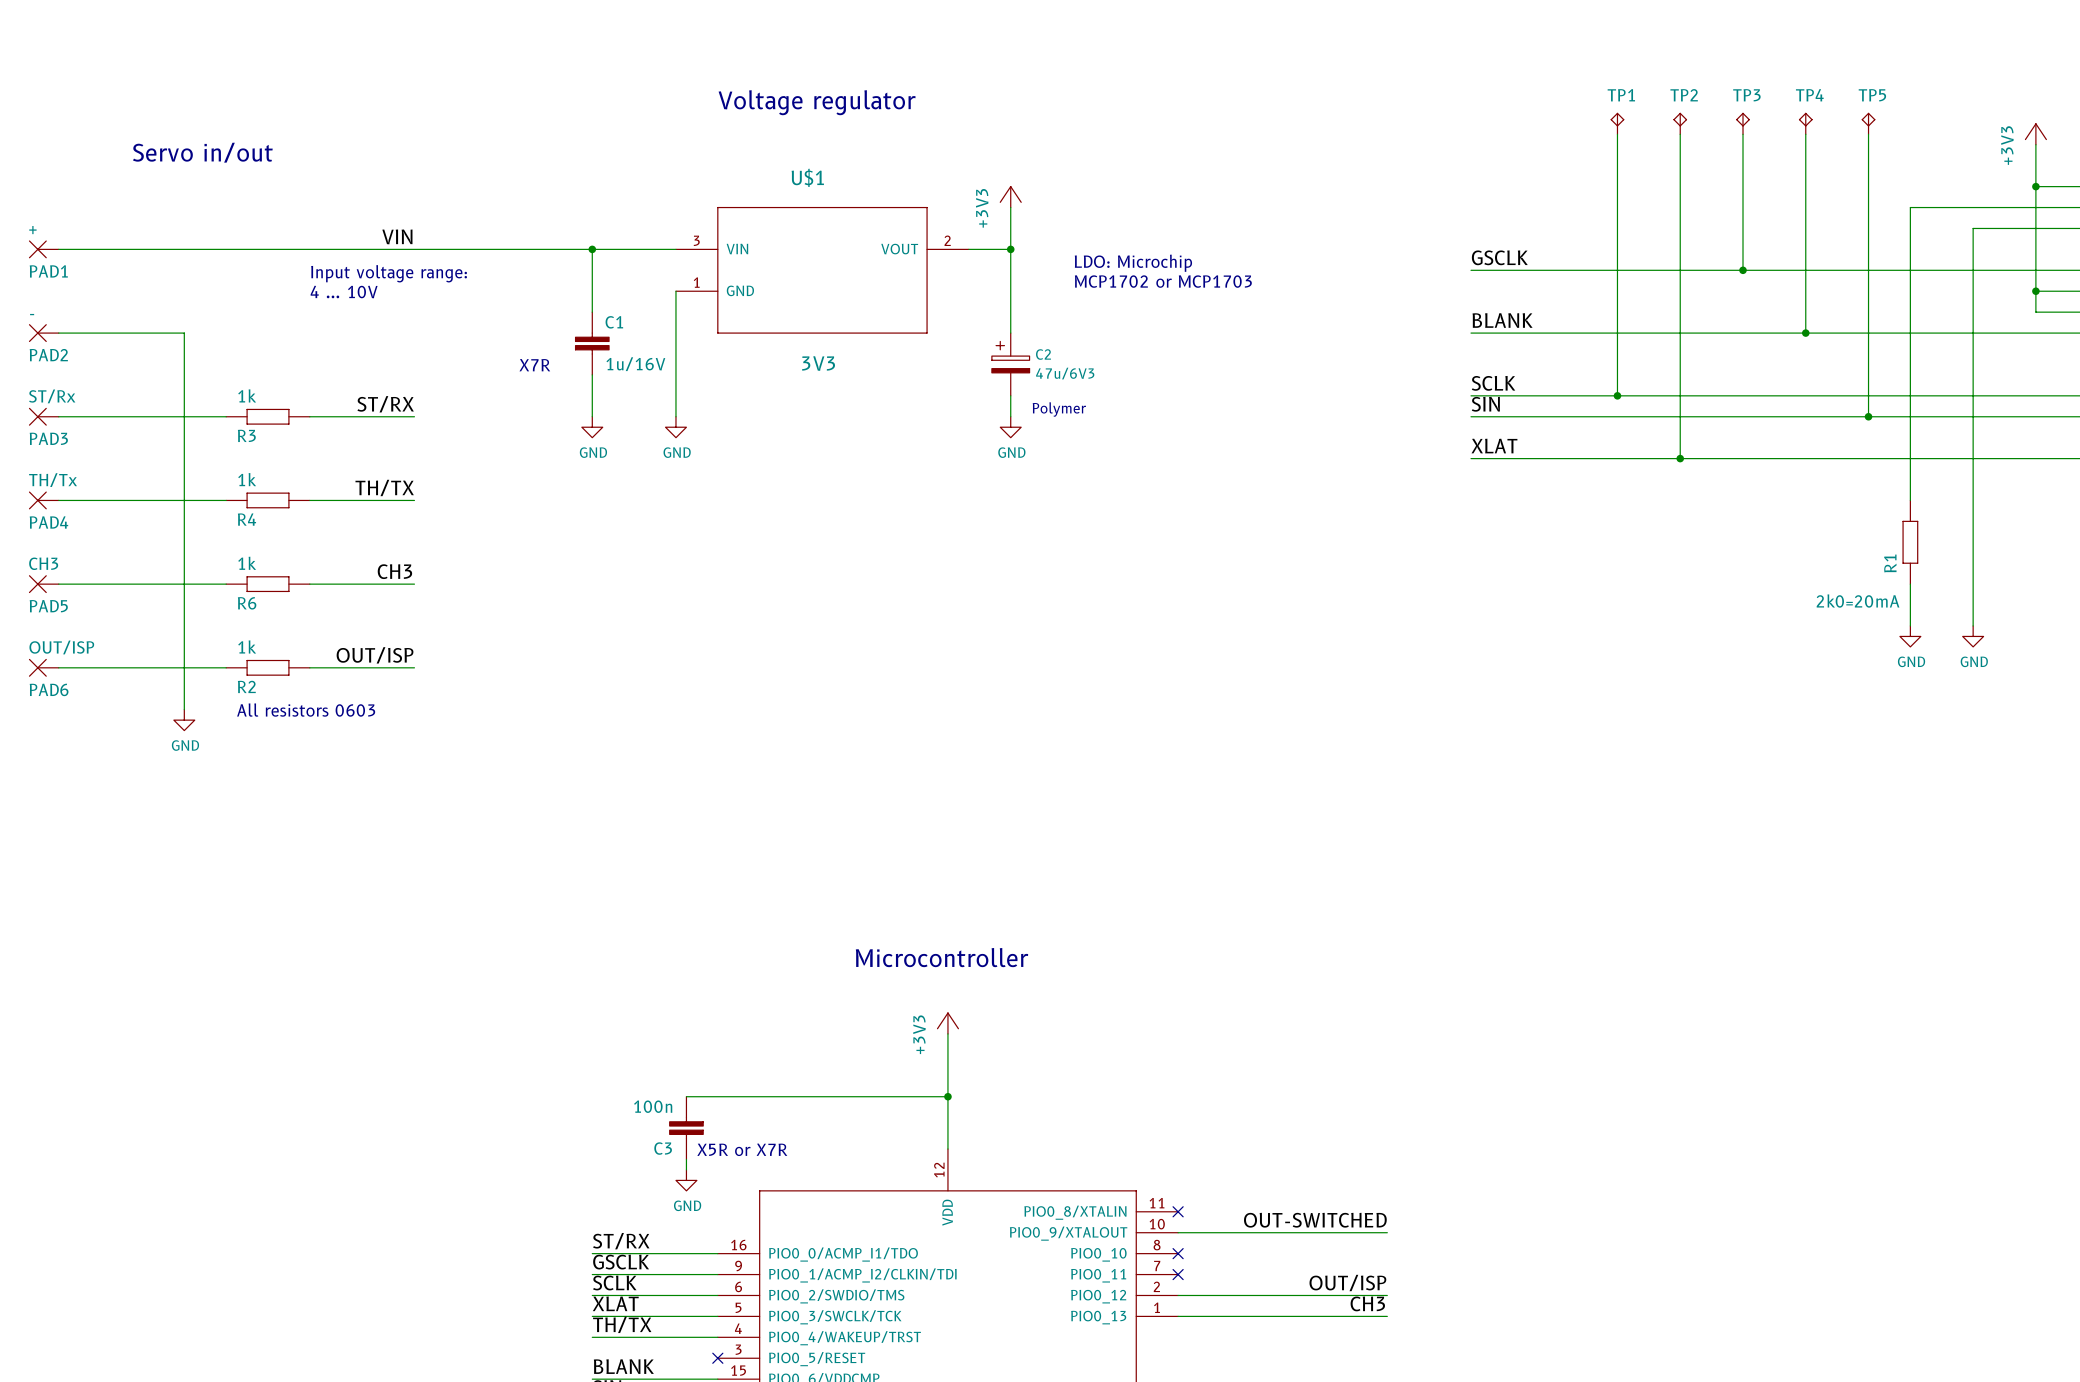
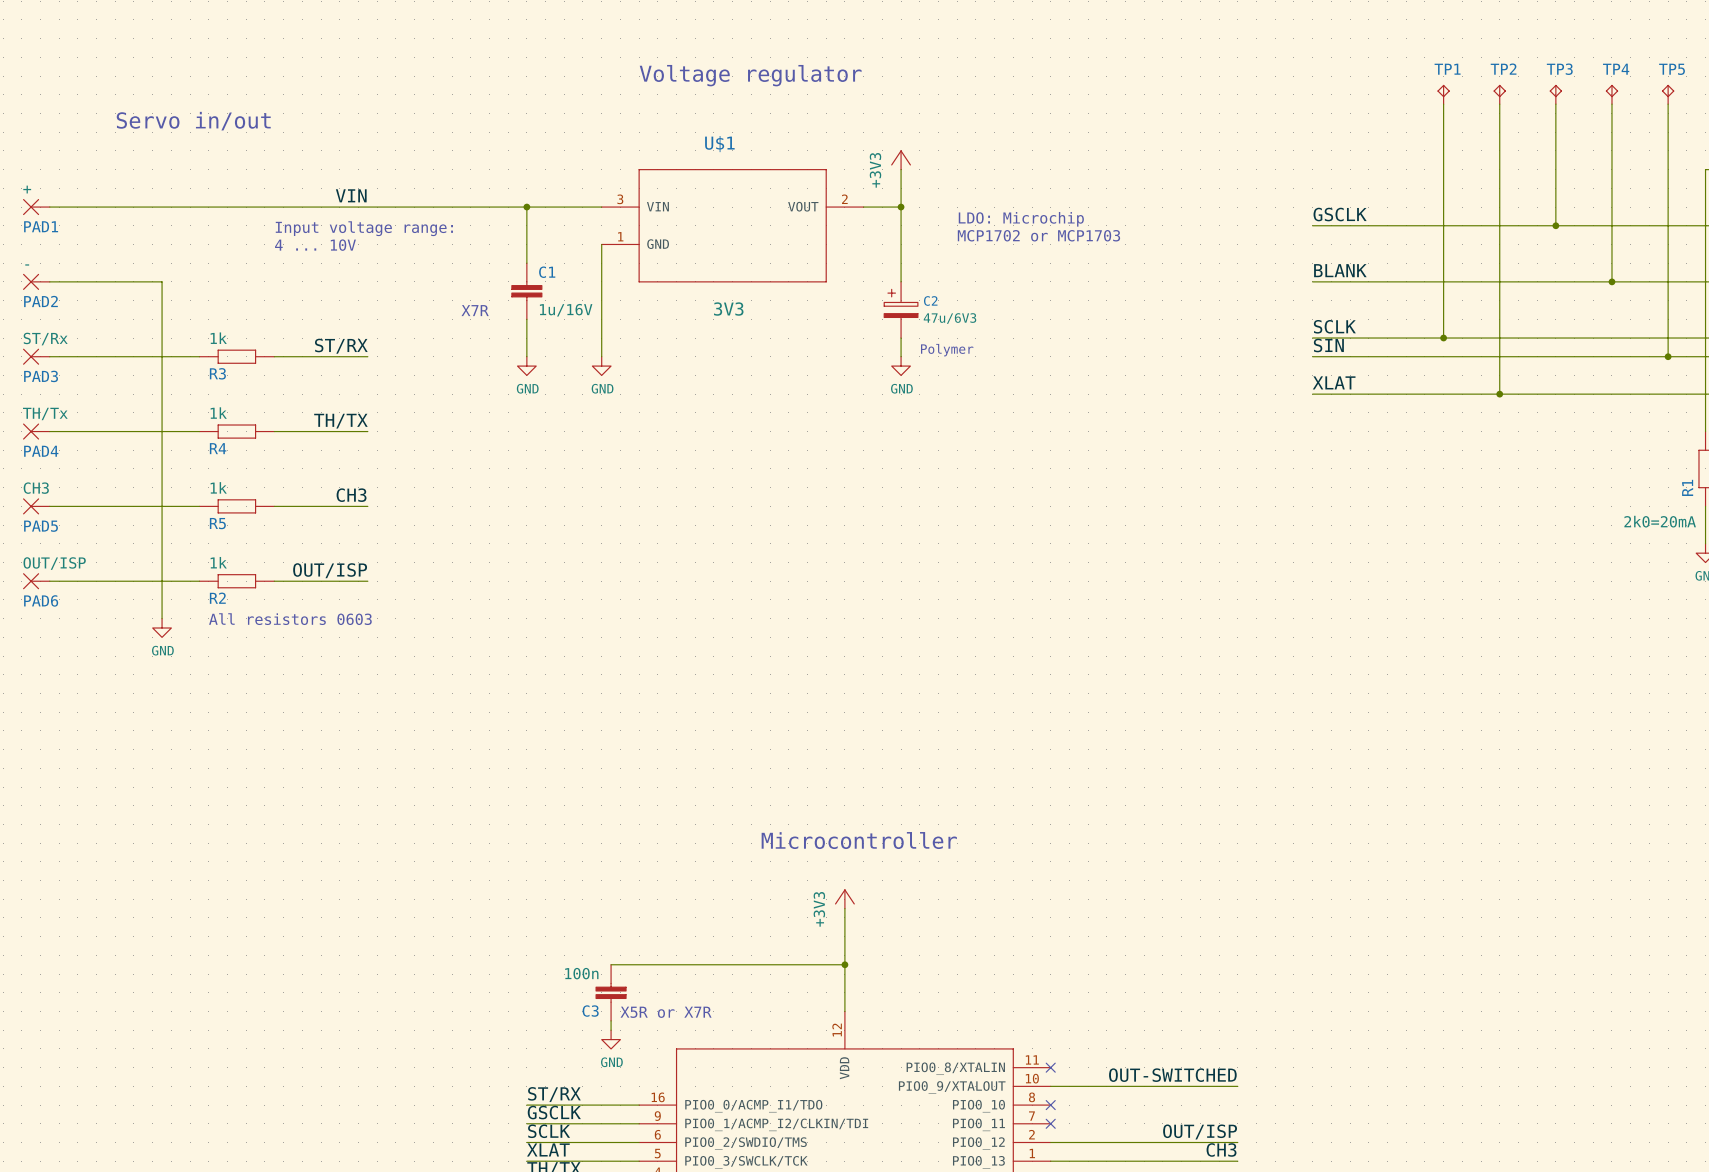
R6 name: R6 (247, 603) -> R5 (217, 523)

